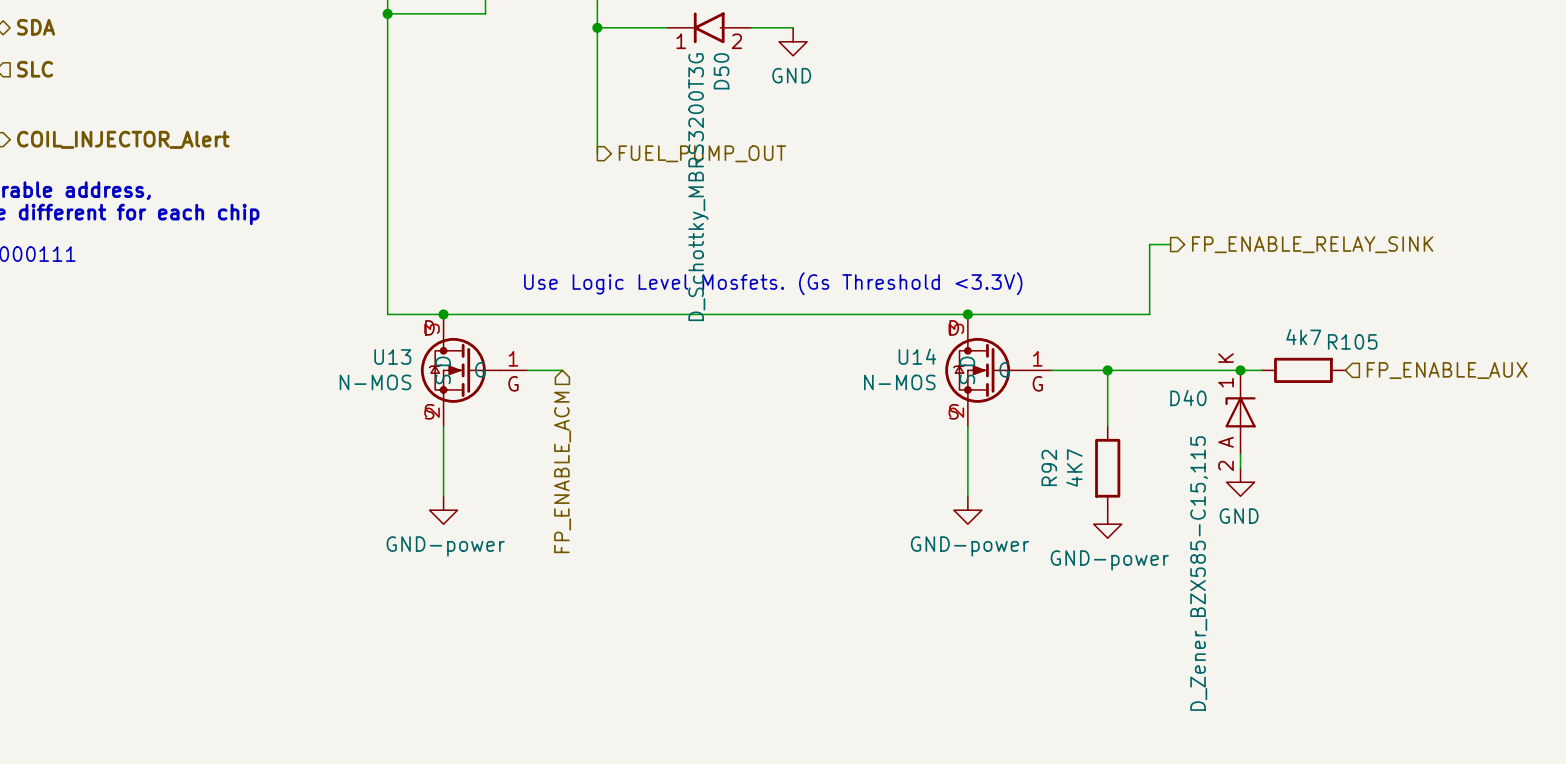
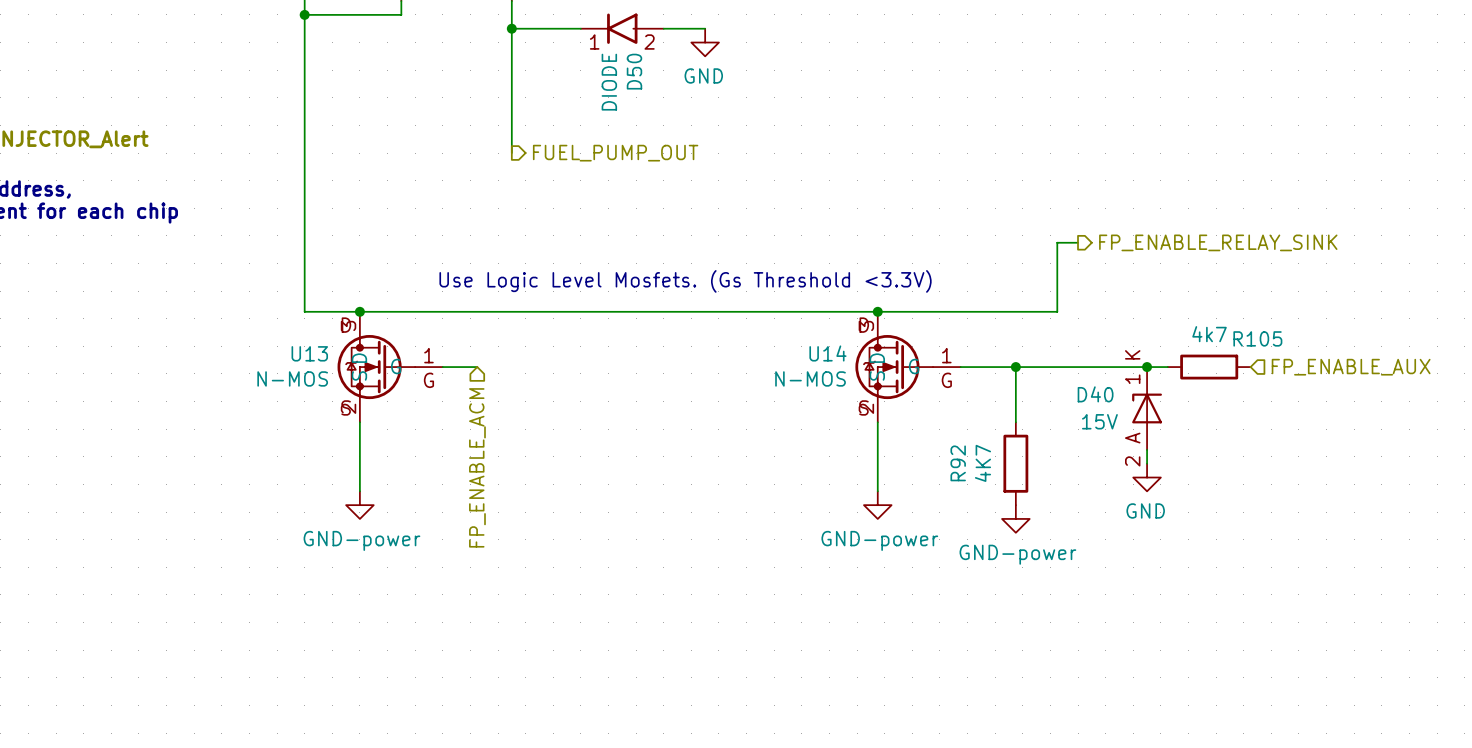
D50 value: D_Schottky_MBRS3200T3G (698, 187) -> DIODE (609, 82)
D40 value: D_Zener_BZX585-C15,115 (1199, 573) -> 15V (1099, 421)

